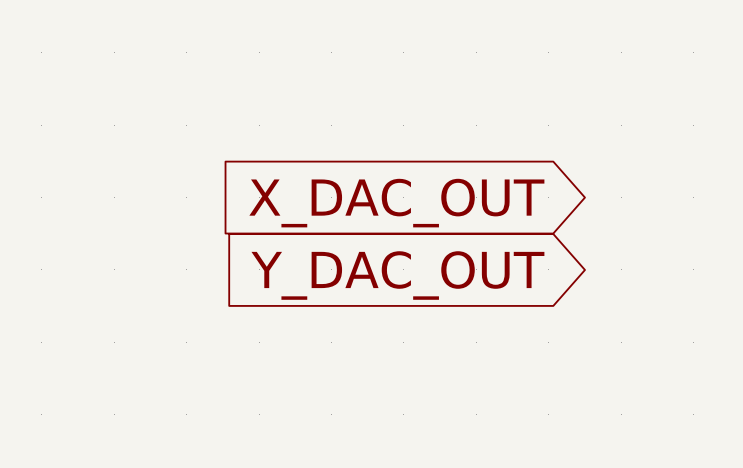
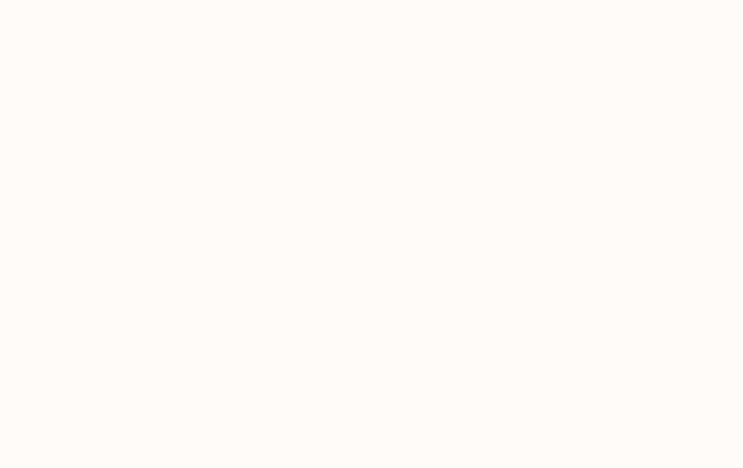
global label: X_DAC_OUT (396, 203) -> none
global label: Y_DAC_OUT (397, 275) -> none

